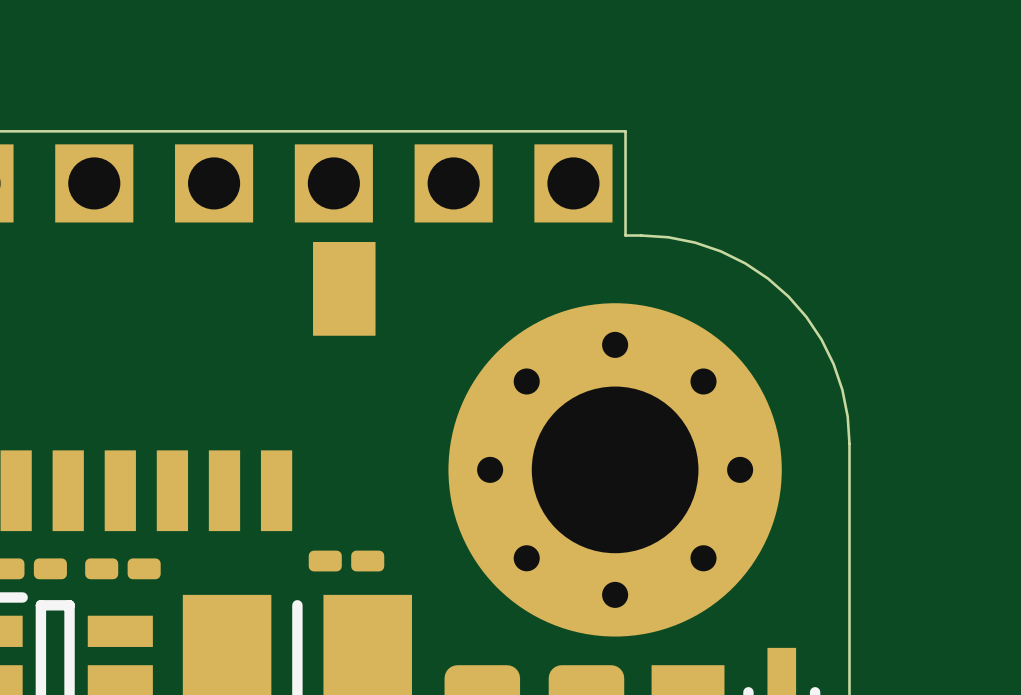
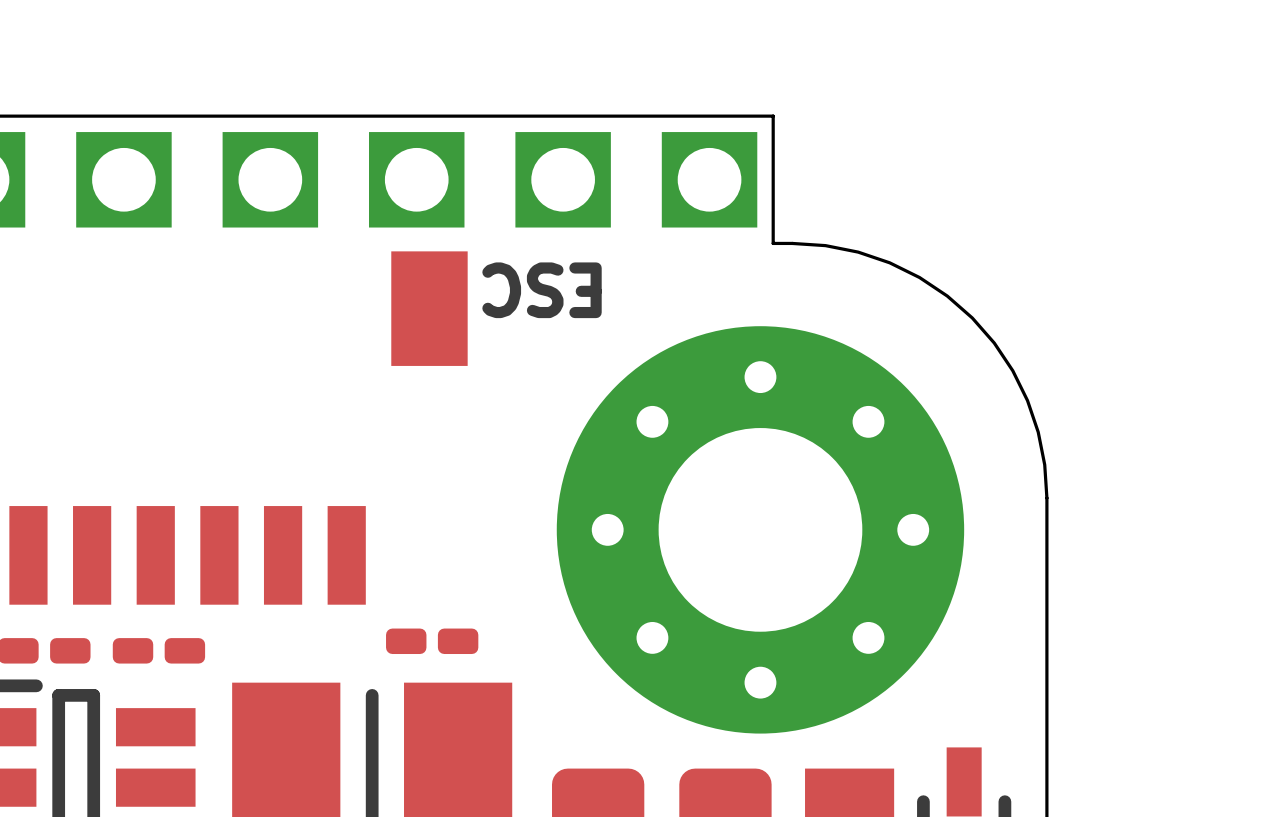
text: none -> ESC (542, 290)

